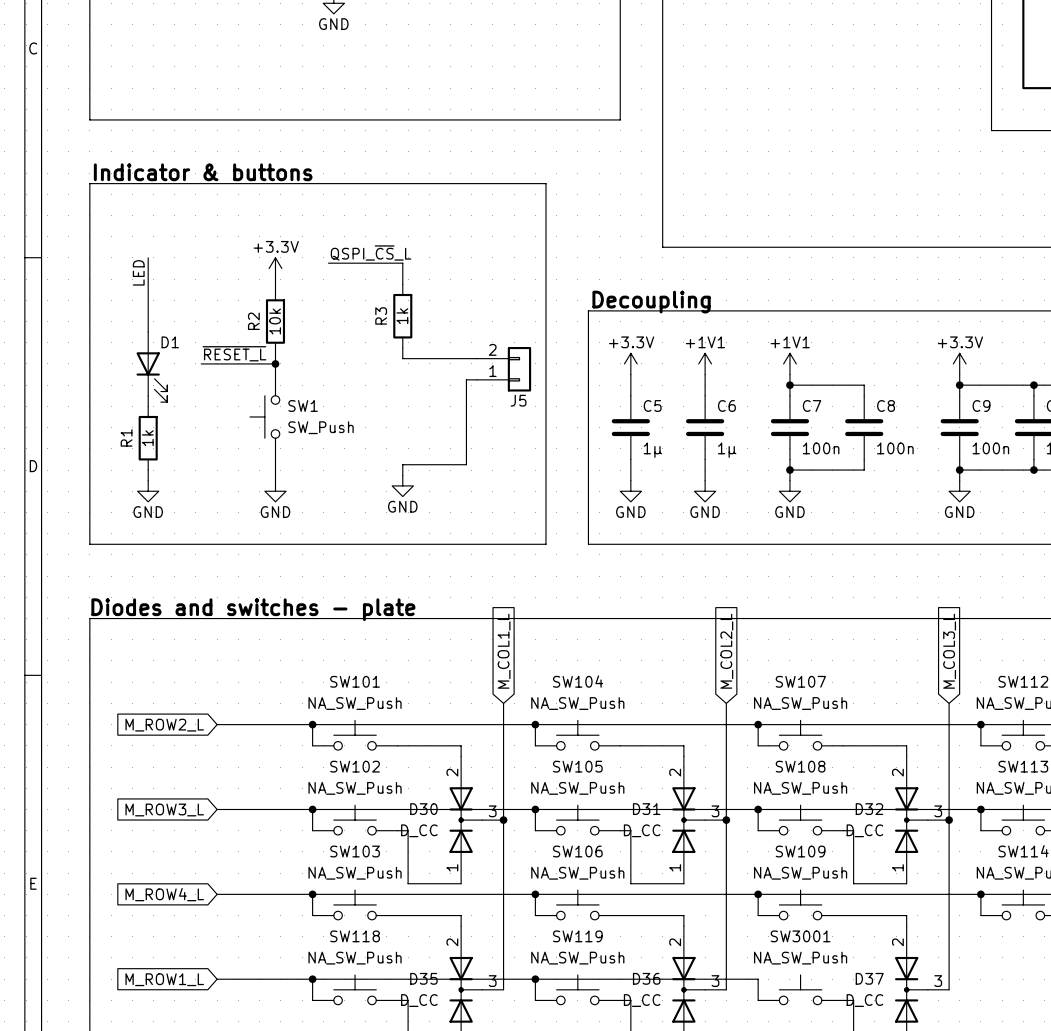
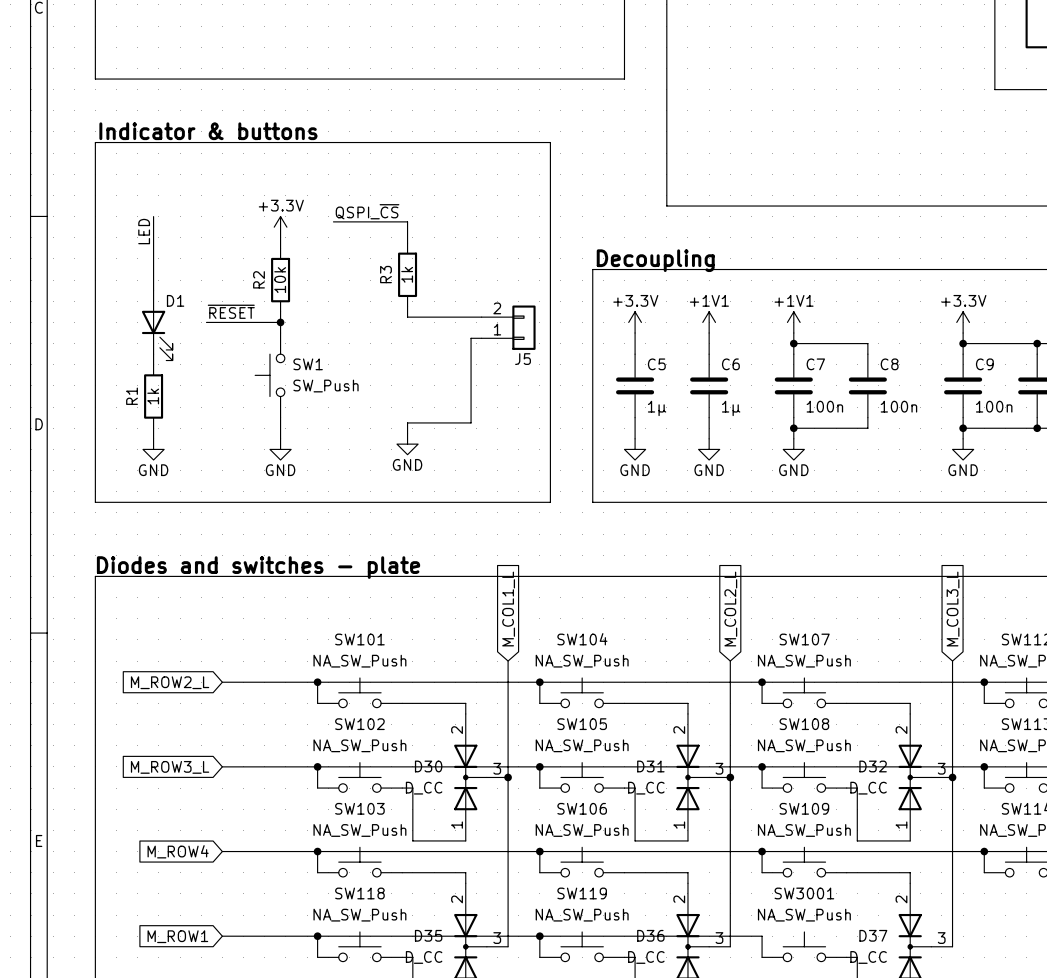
label: QSPI_~{CS}_L (371, 252) -> QSPI_~{CS} (367, 211)
label: ~{RESET_L} (234, 353) -> ~{RESET} (231, 311)
global label: M_ROW4_L (164, 894) -> M_ROW4 (178, 851)
global label: M_ROW1_L (164, 979) -> M_ROW1 (177, 936)

